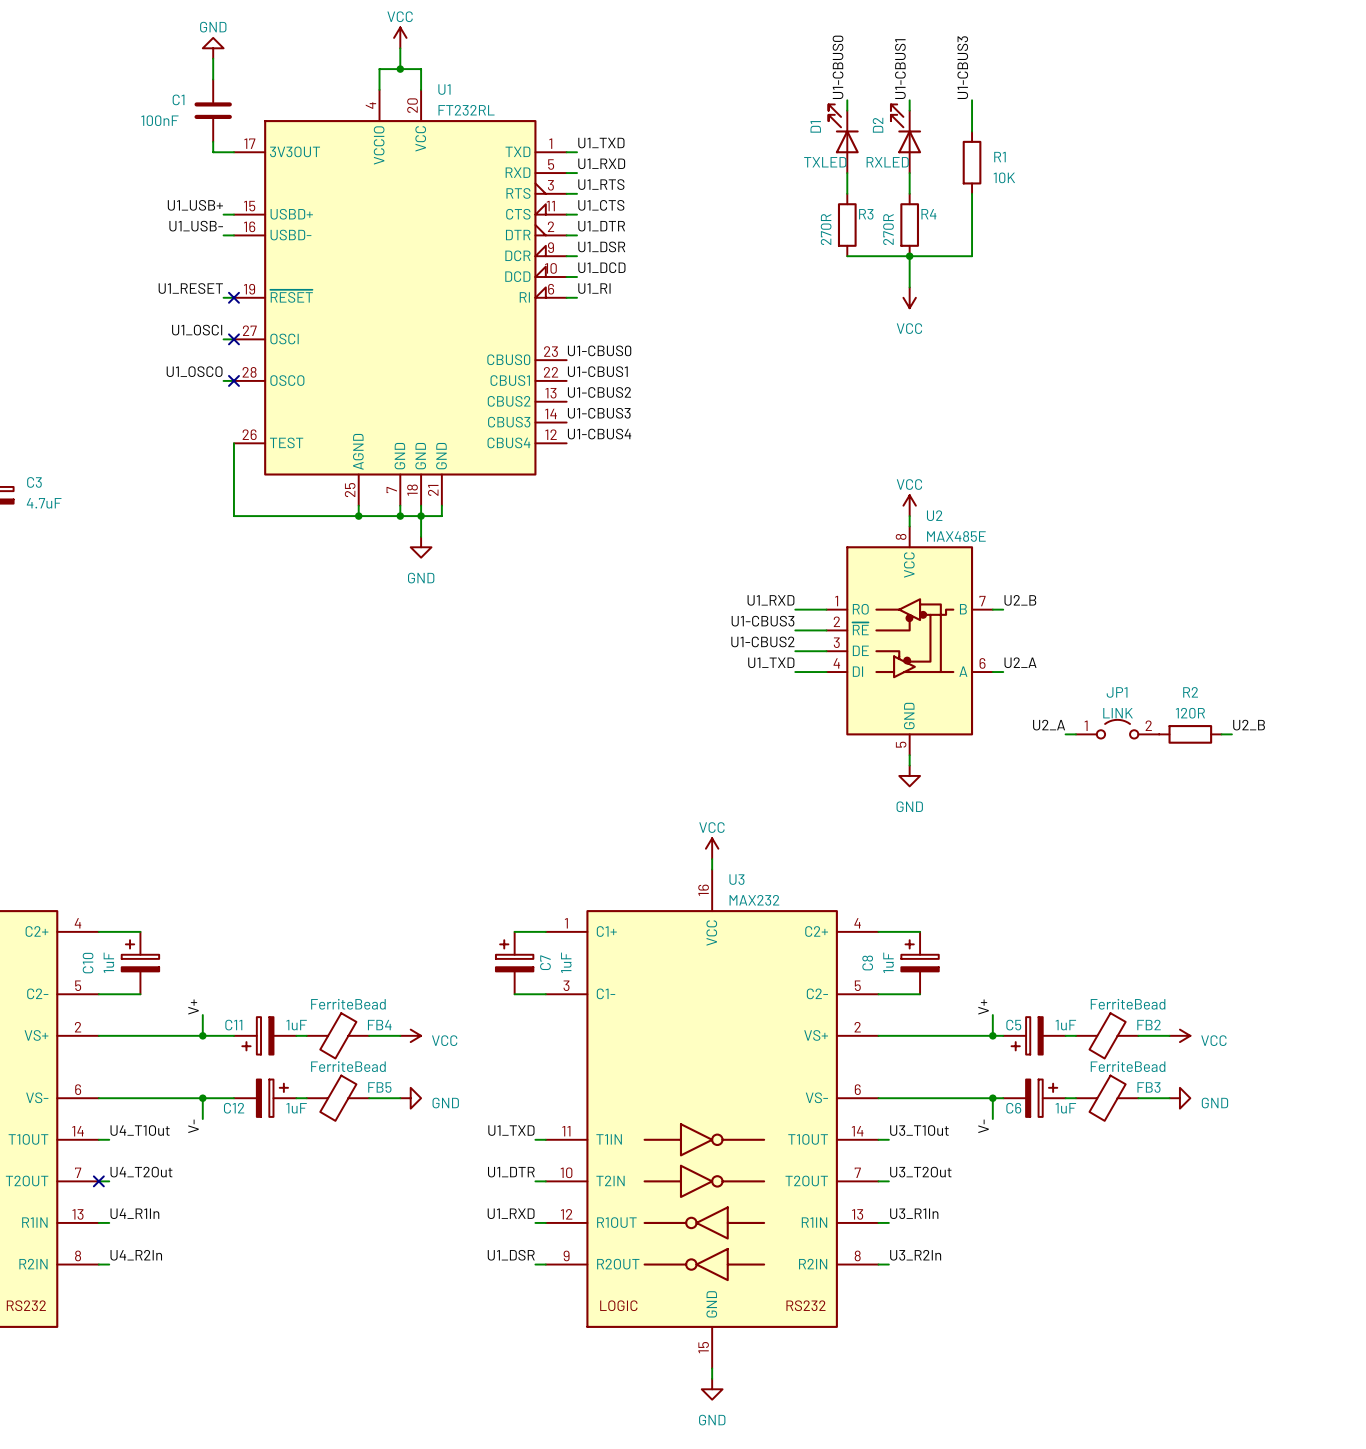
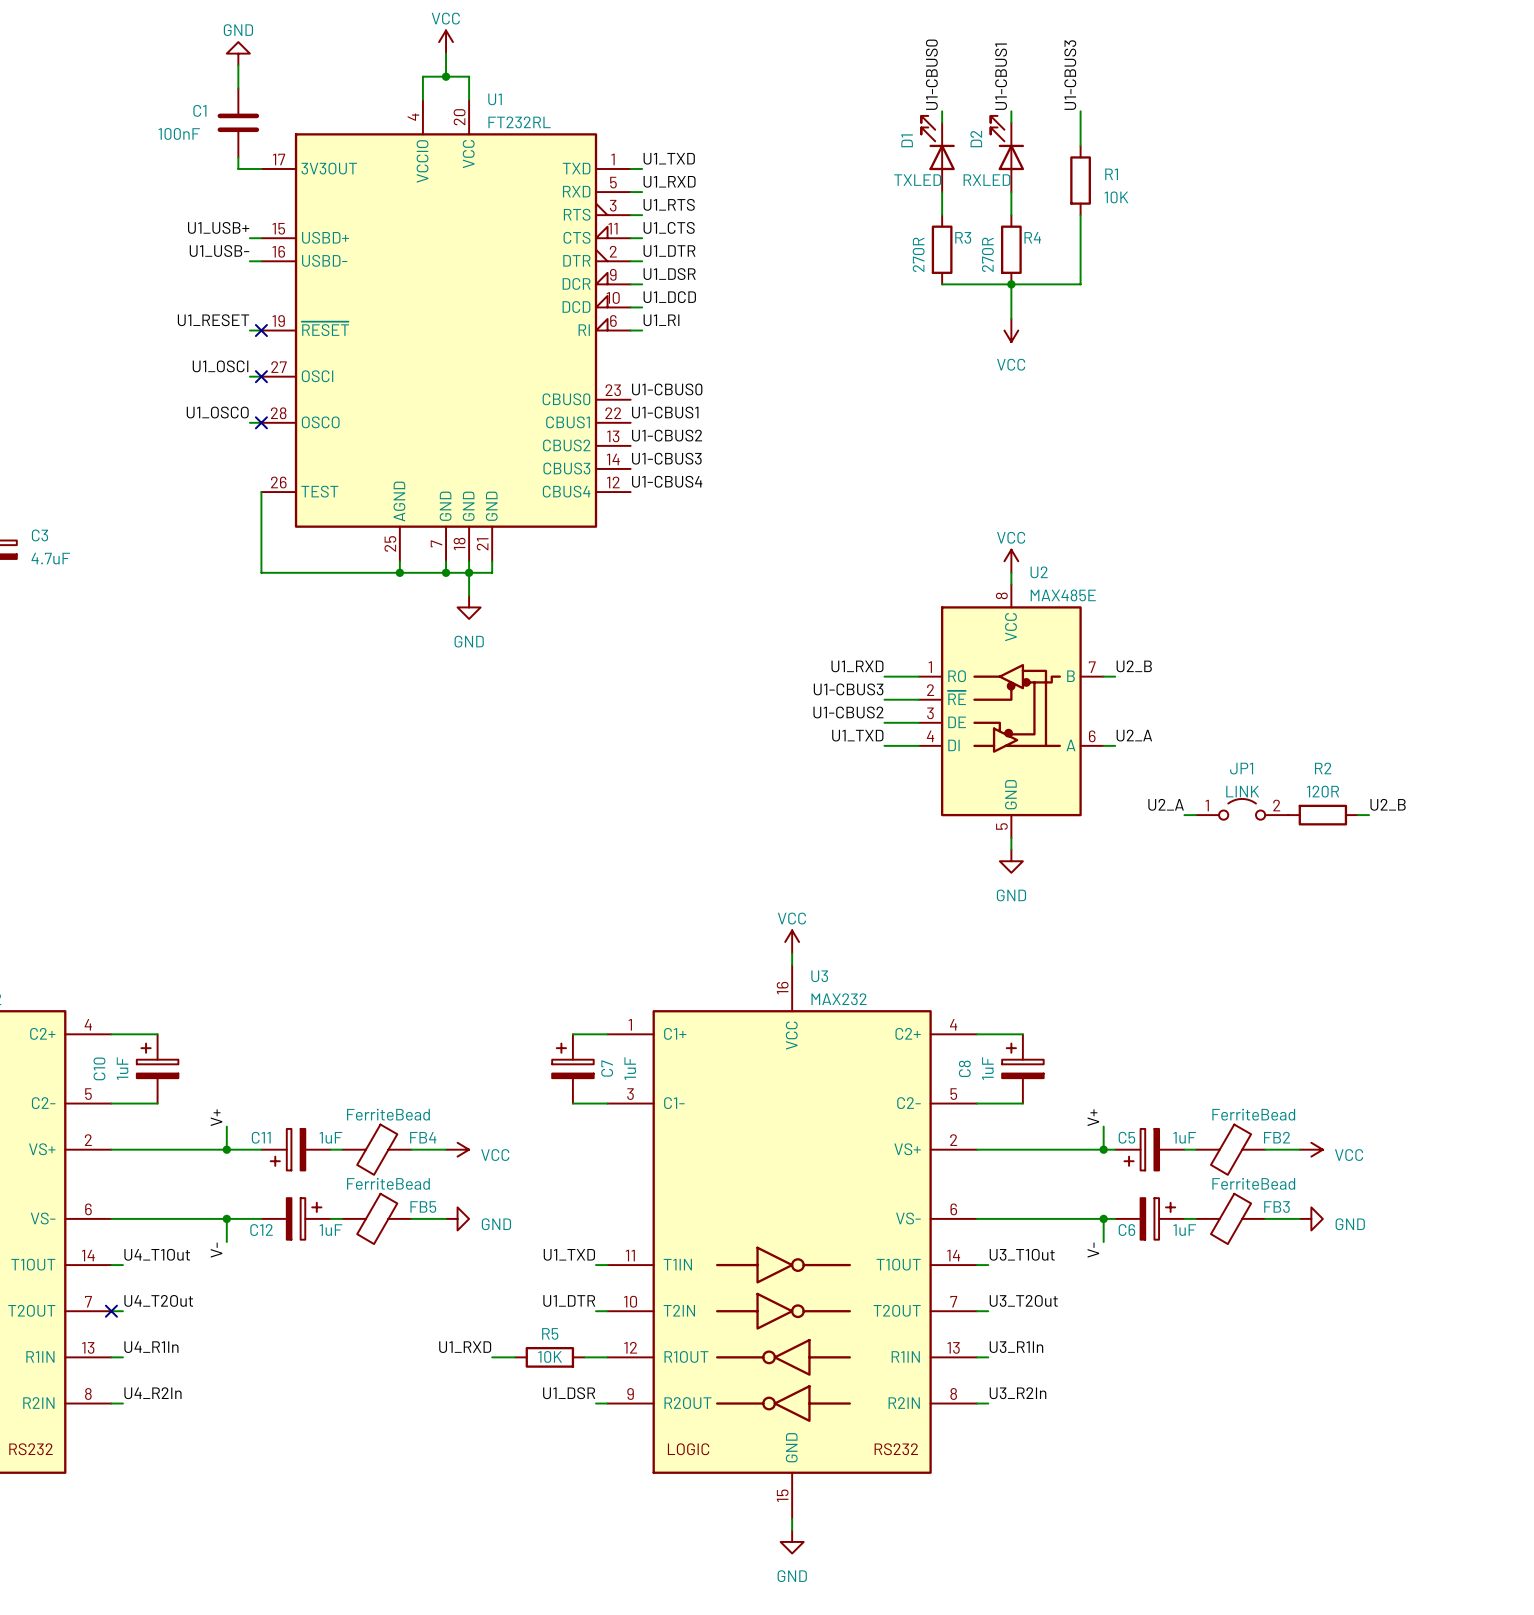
label position: U1_RXD (511, 1213) -> U1_RXD (465, 1347)
wire: none -> (492, 1357) (515, 1357)
R5: none -> 10K (549, 1357)
wire: none -> (584, 1357) (596, 1357)

